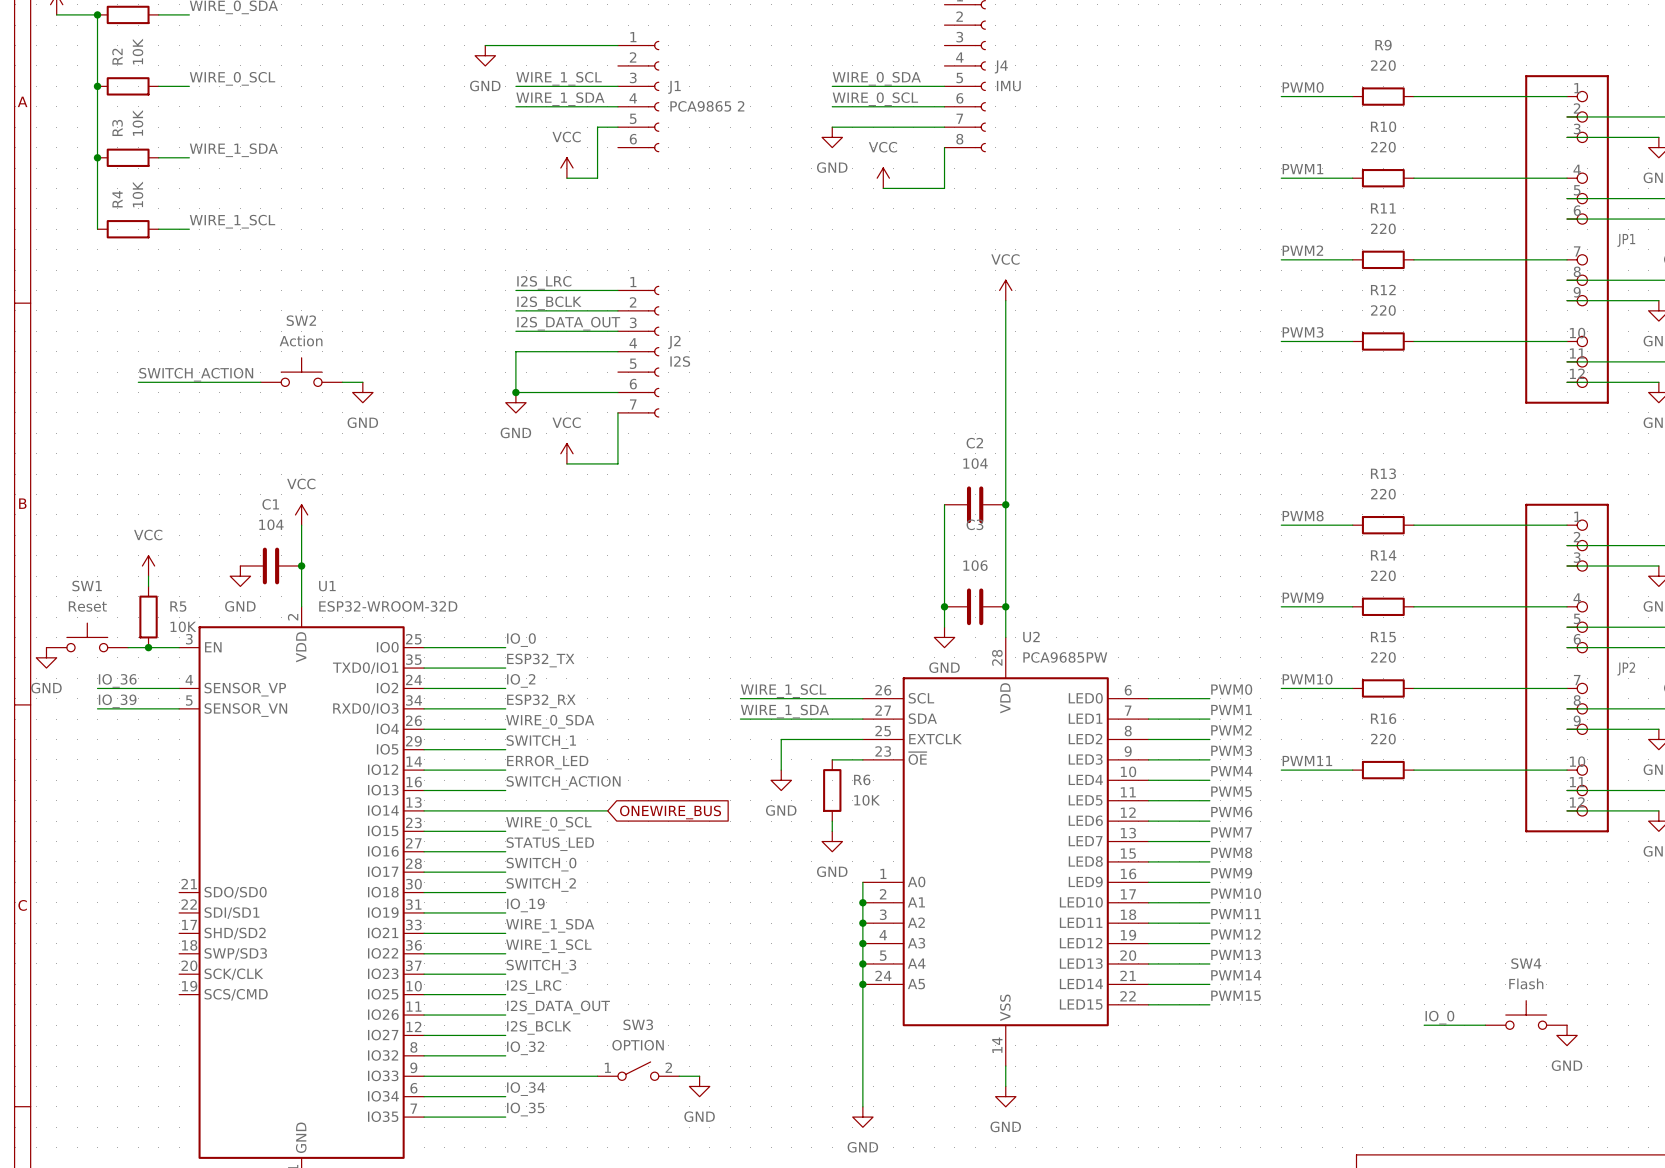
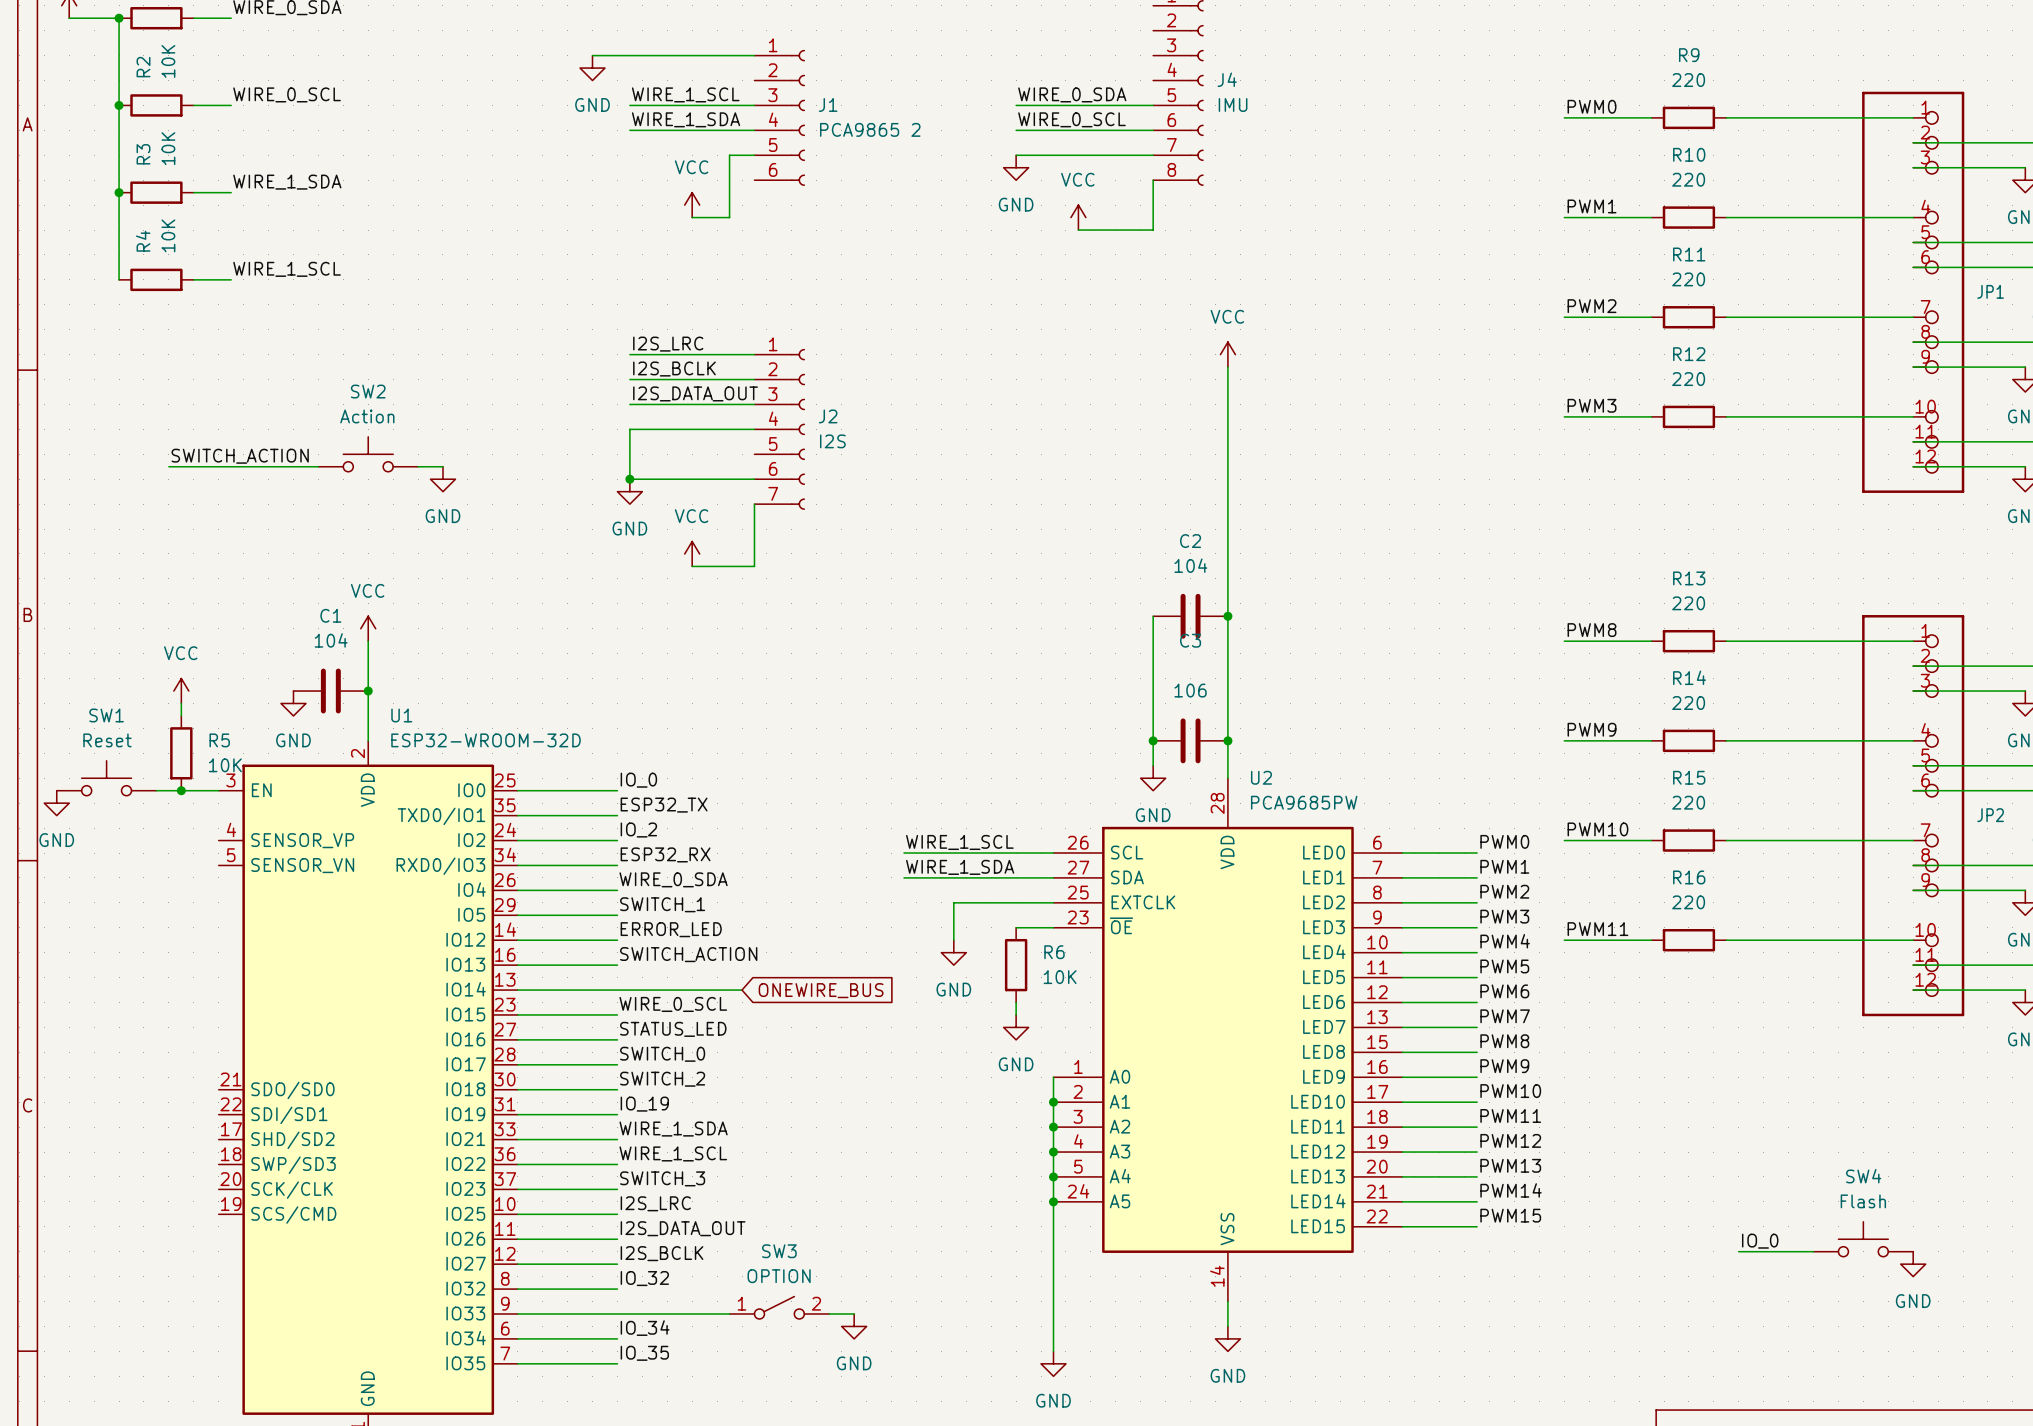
label: IO_36 (117, 680) -> none
wire: (97, 688) (179, 688) -> none
label: IO_39 (117, 701) -> none
wire: (97, 708) (179, 708) -> none

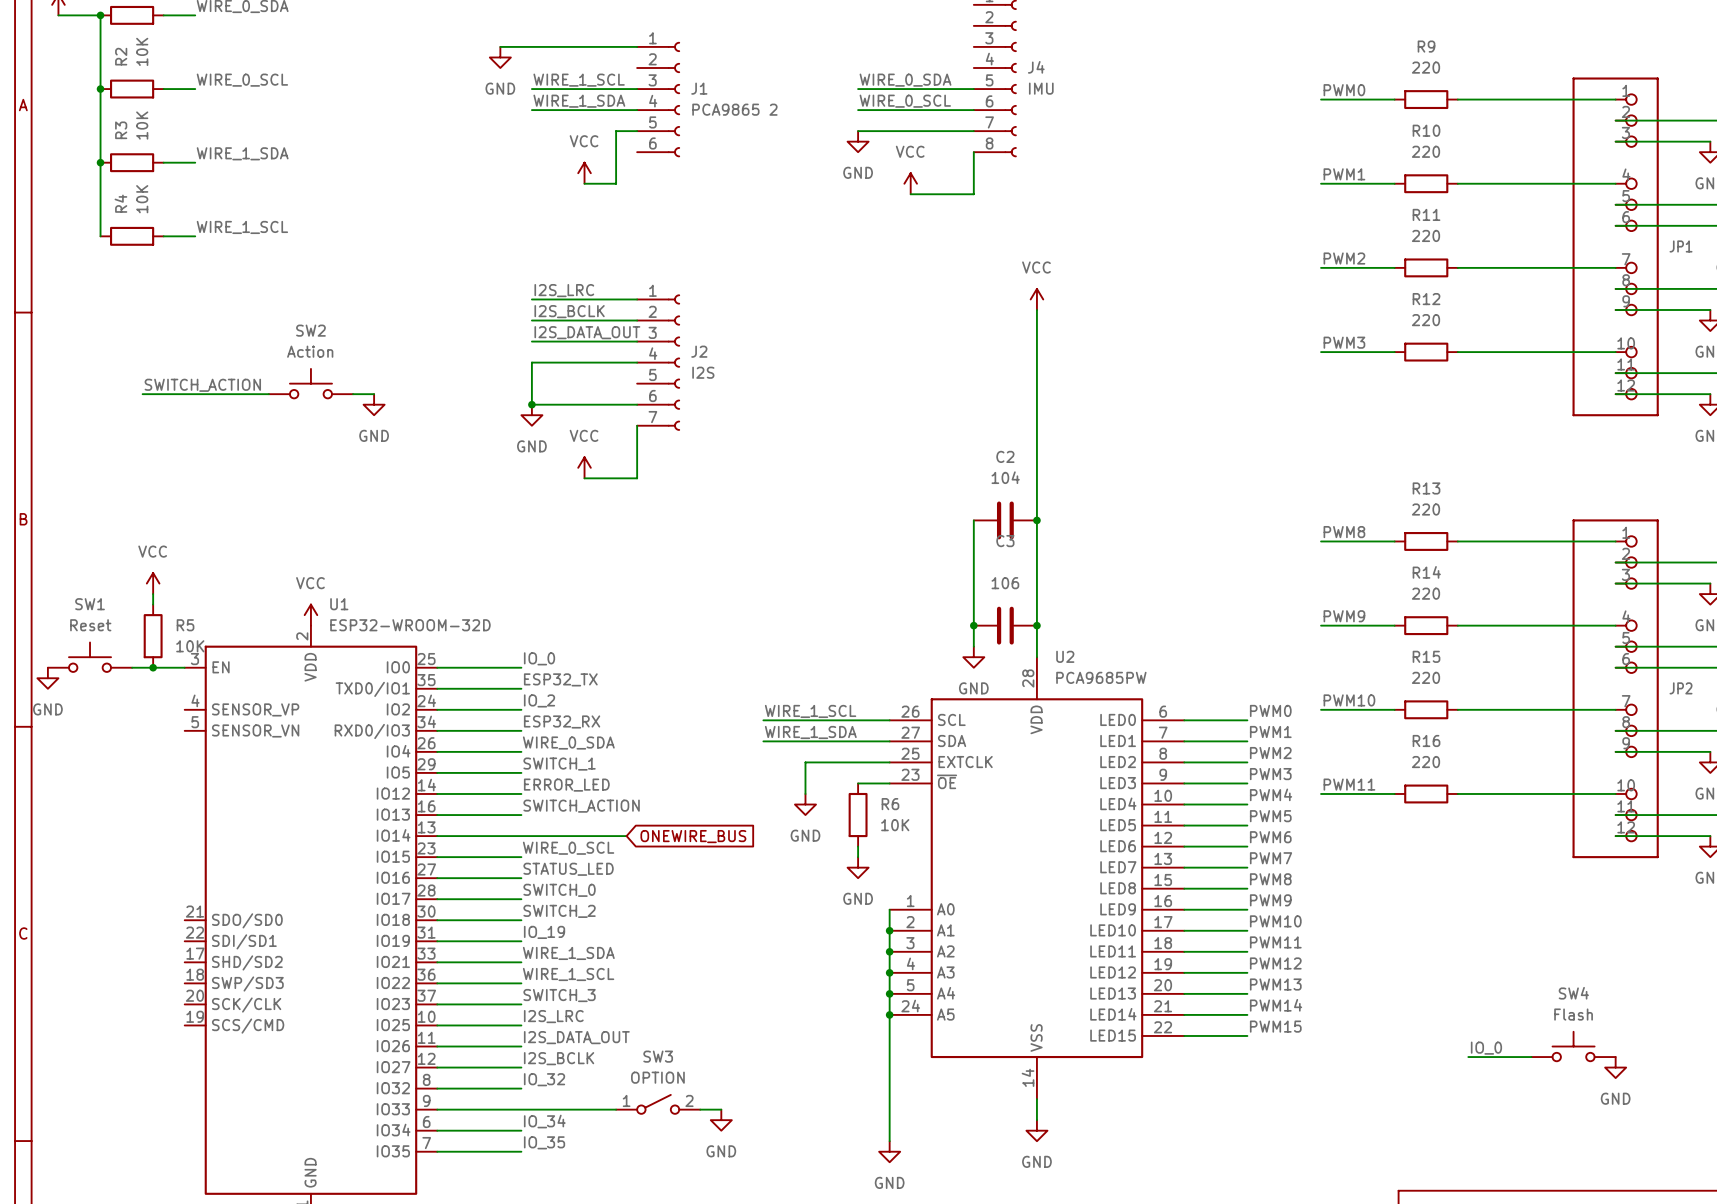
power symbol position: VCC (368, 628) -> VCC (310, 615)
wire: (368, 641) (368, 740) -> none
C1: 104 (330, 691) -> none
junction: (368, 691) -> none
power symbol: GND (293, 703) -> none

